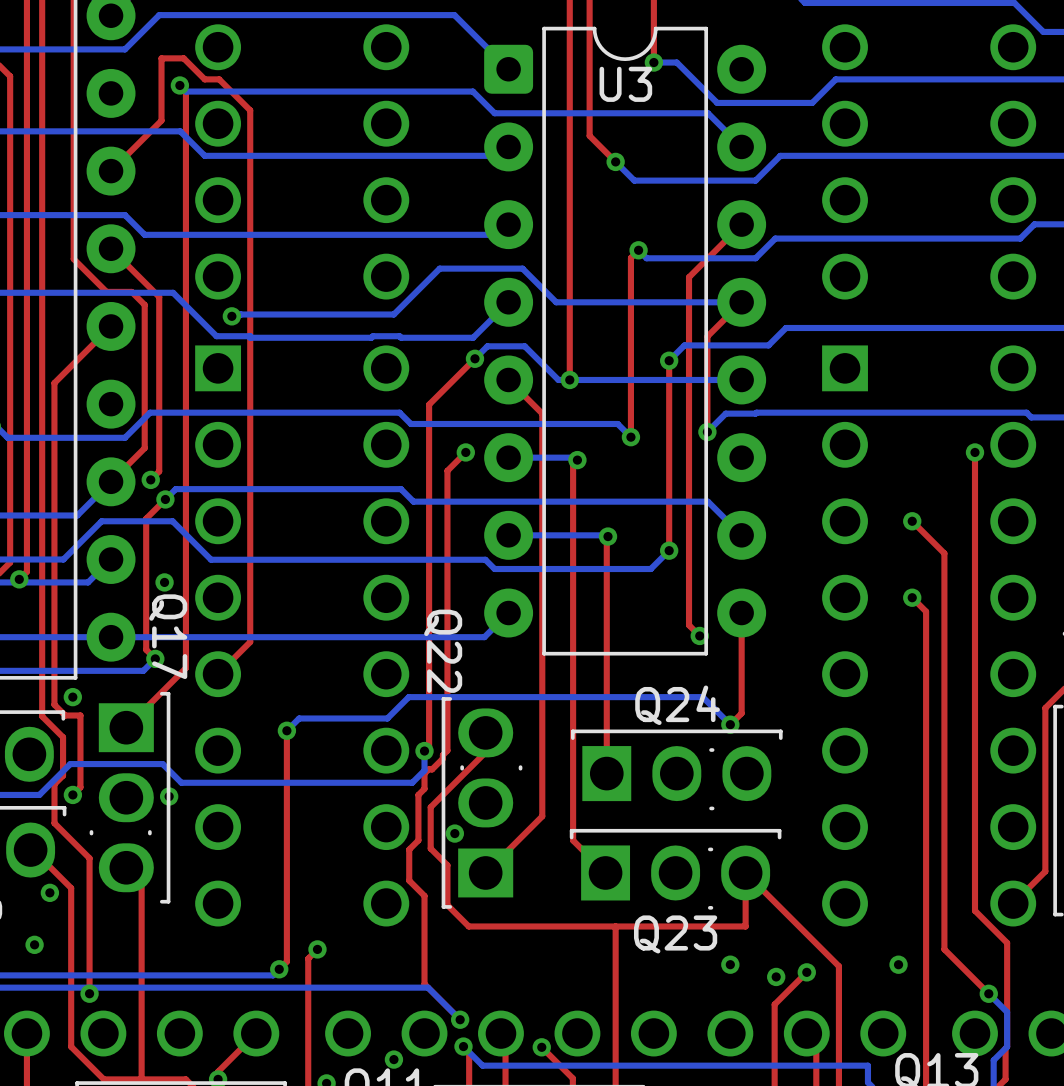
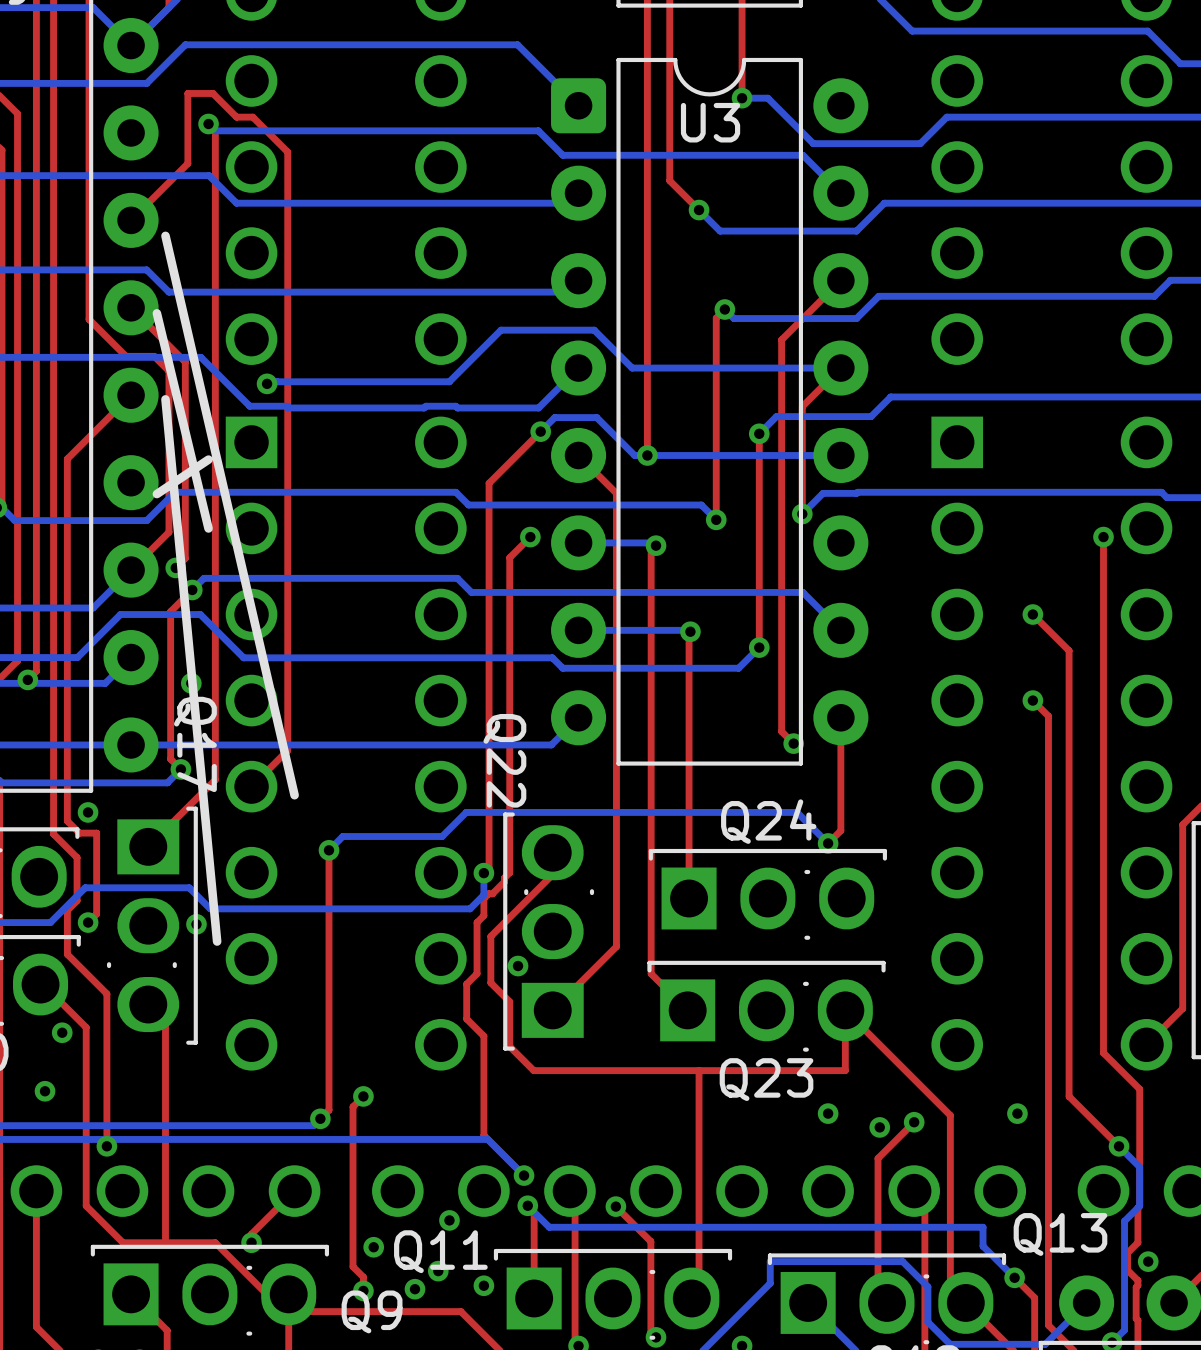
line: none -> (165, 235) (294, 795)
line: none -> (156, 313) (208, 528)
line: none -> (165, 399) (217, 941)
line: none -> (208, 459) (156, 494)

